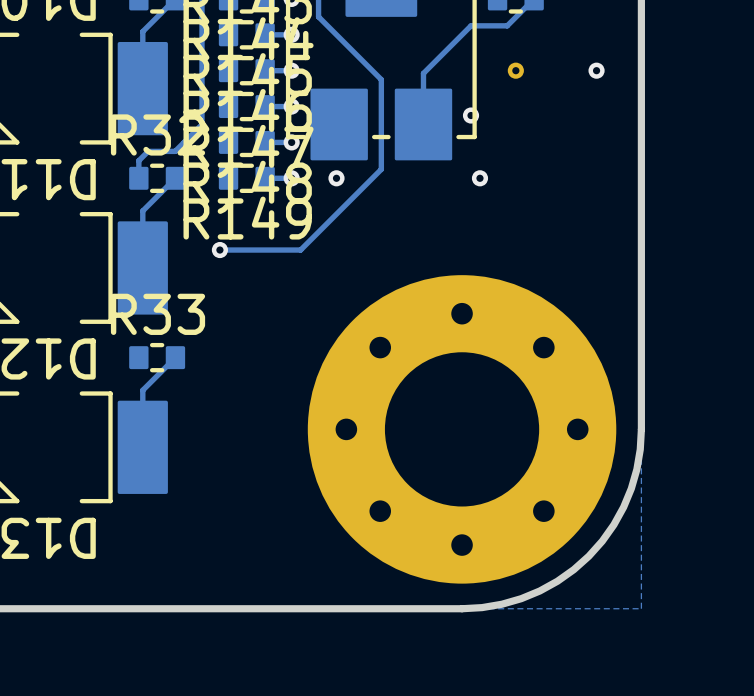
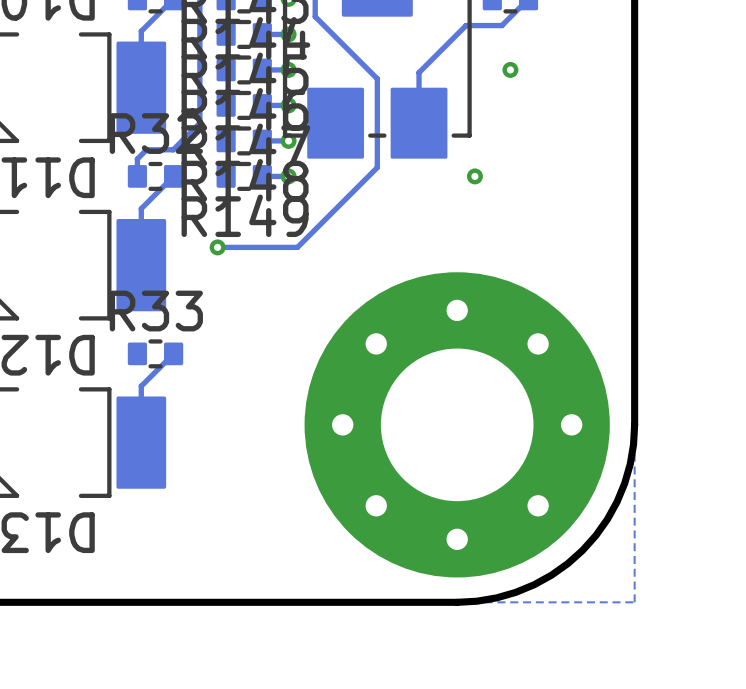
via: (596, 70) -> none
via: (471, 115) -> none
via: (336, 178) -> none

